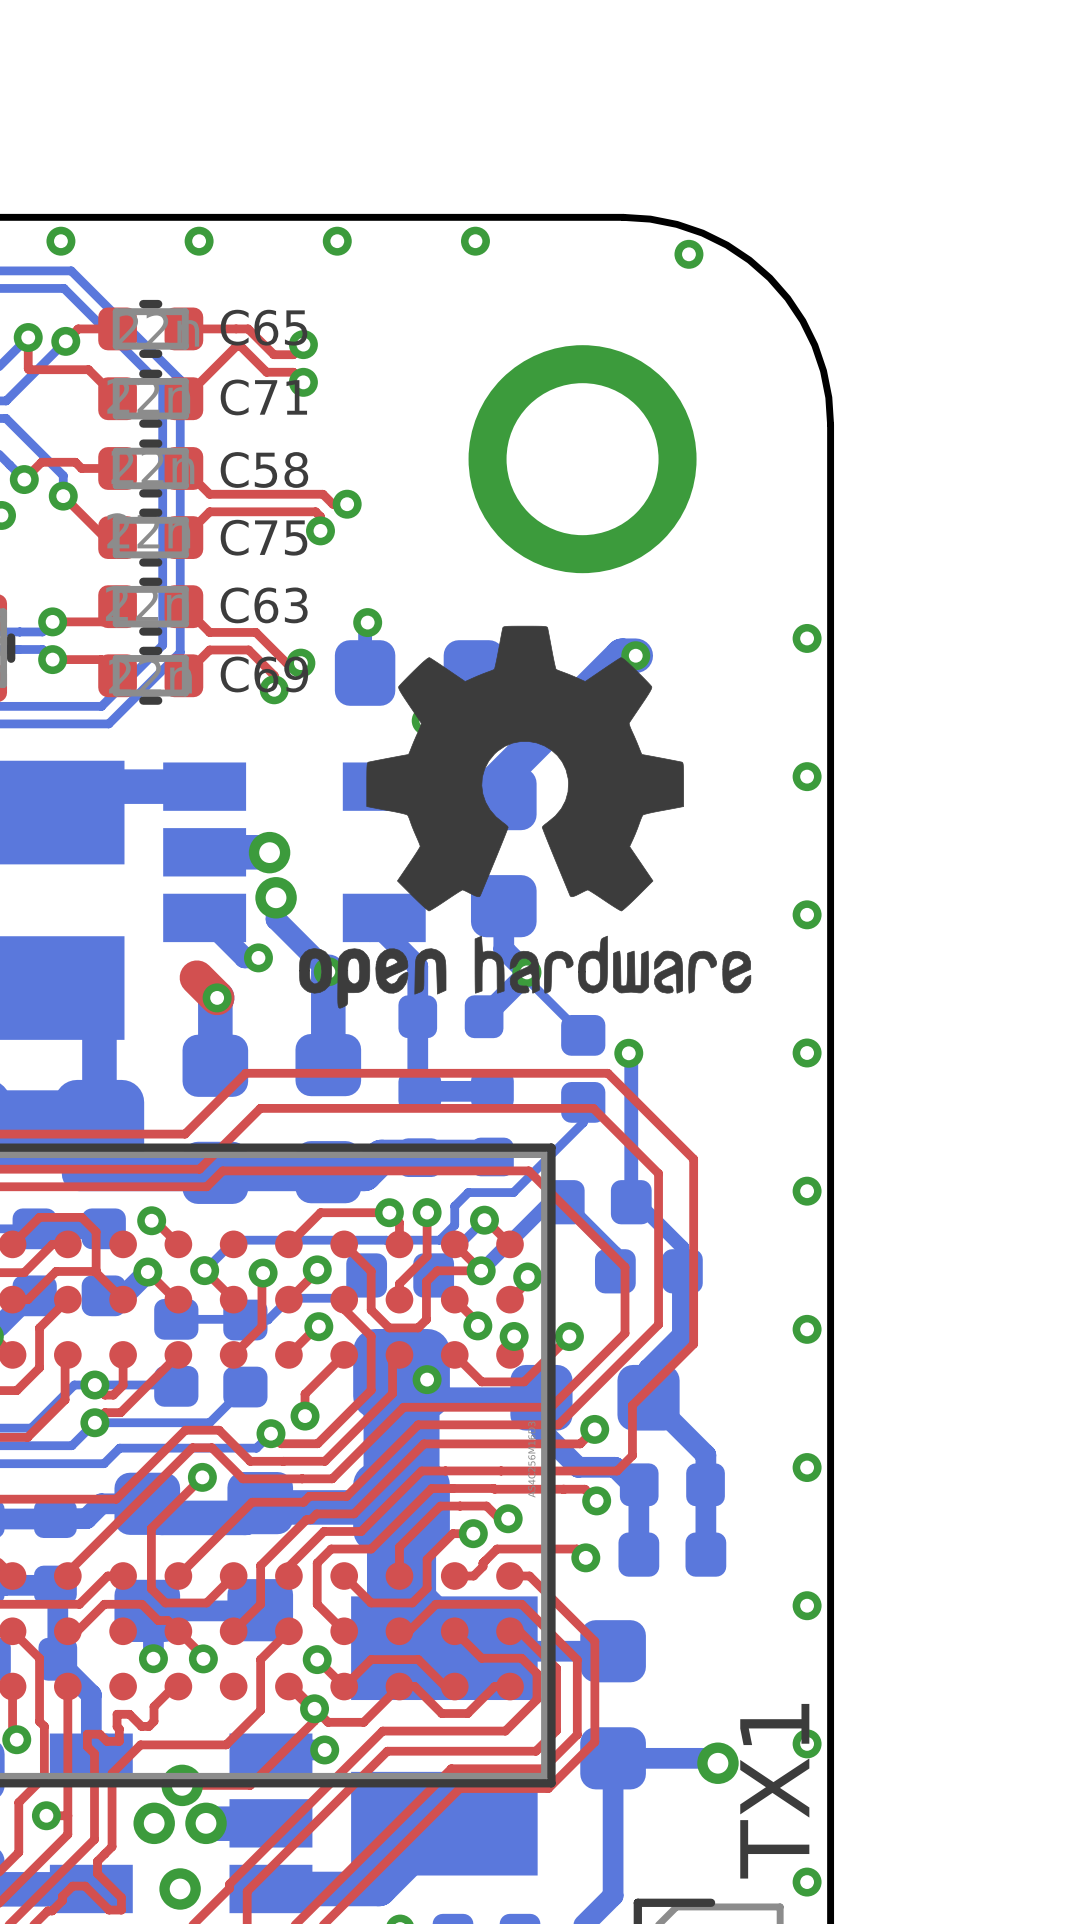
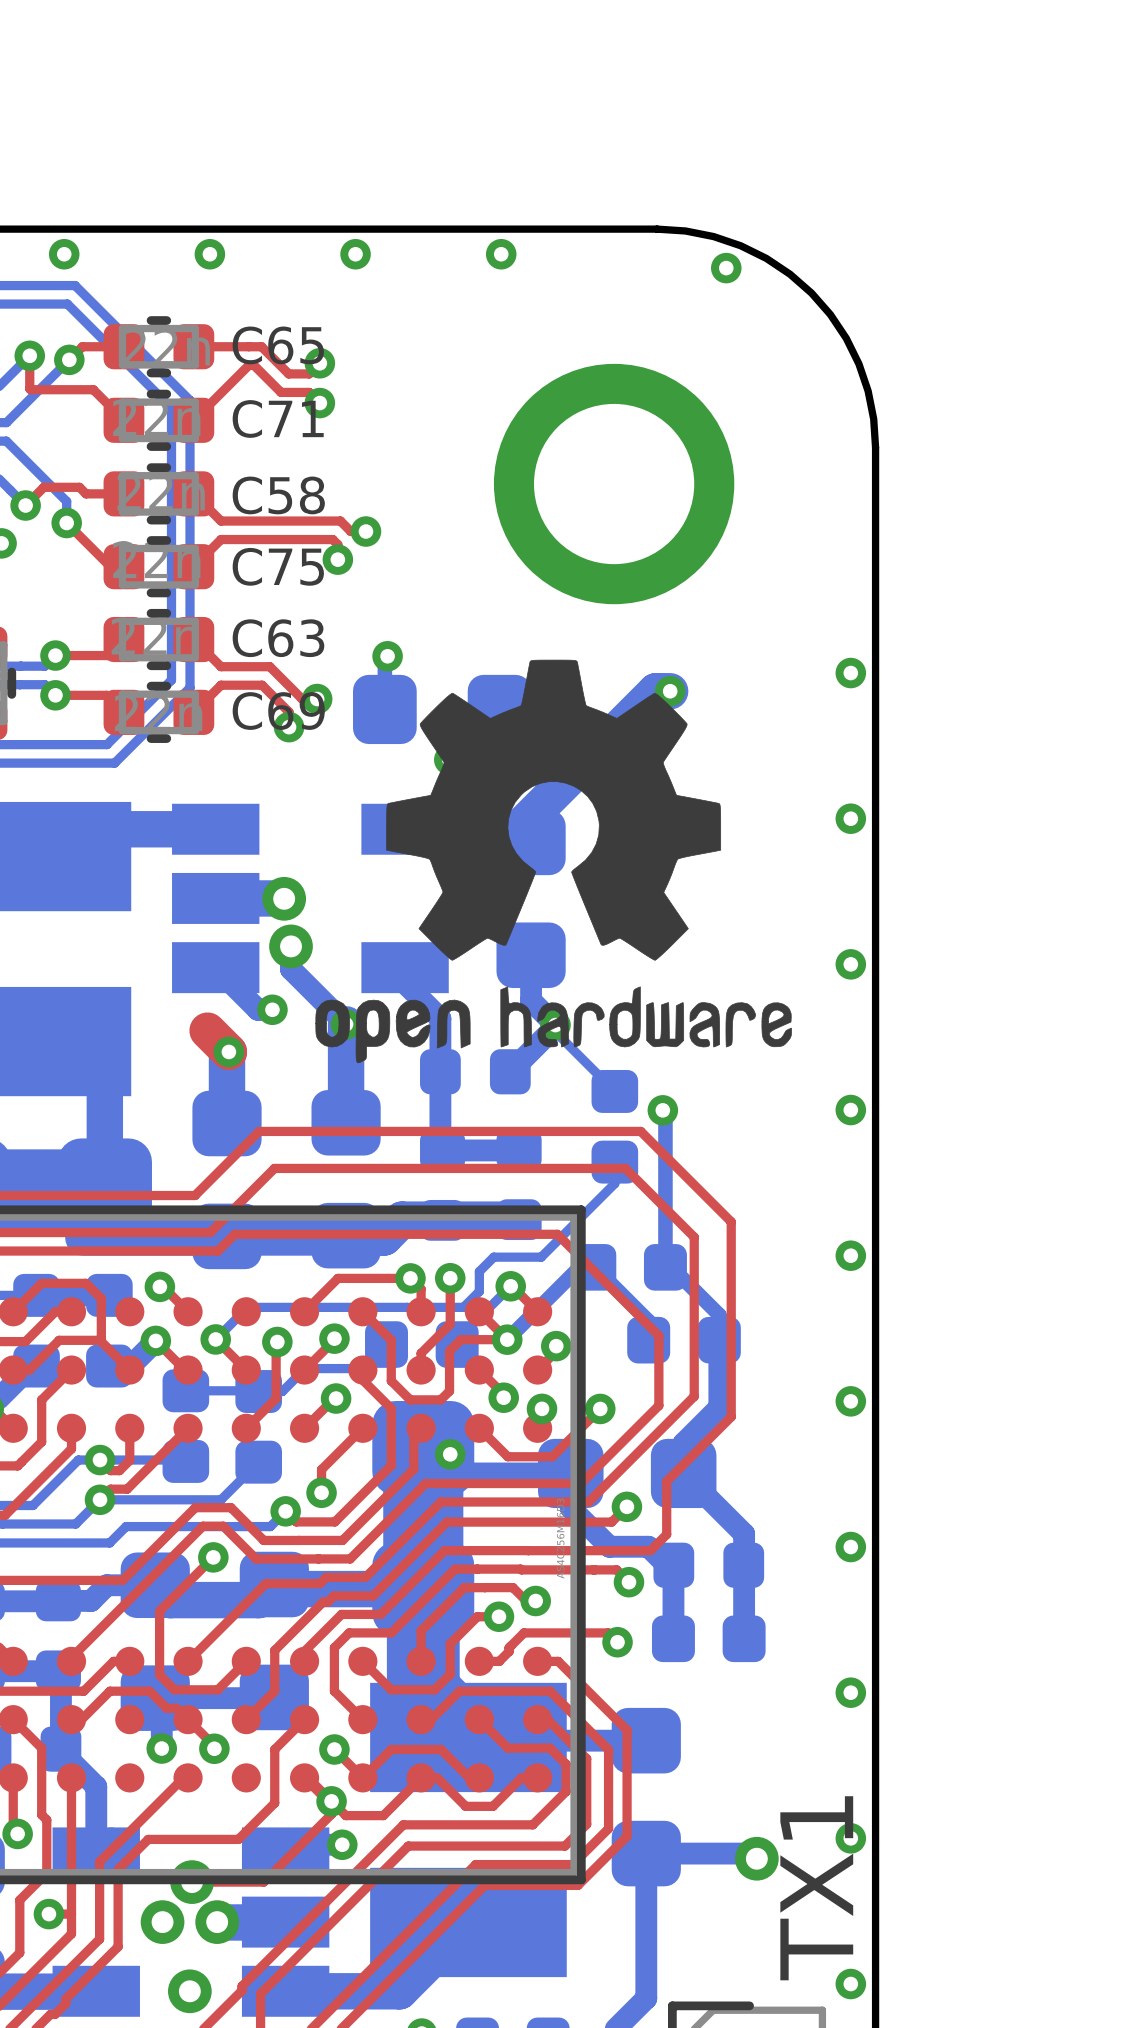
top track: (67, 1354) (65, 1357) (65, 1399) (27, 1437) (4, 1437) -> (71, 1428) (71, 1448) (5, 1515)
top track: (154, 1706) (154, 1721) (148, 1726) (141, 1726) (129, 1714) (117, 1714) (119, 1741) (106, 1741) (99, 1734) (87, 1734) (87, 1746) (94, 1753) (94, 1766) -> (162, 1799) (99, 1861)
top track: (97, 1861) (97, 1873) (121, 1897) (121, 1910) (109, 1910) (85, 1886) (72, 1886) -> (102, 1962) (76, 1988)

